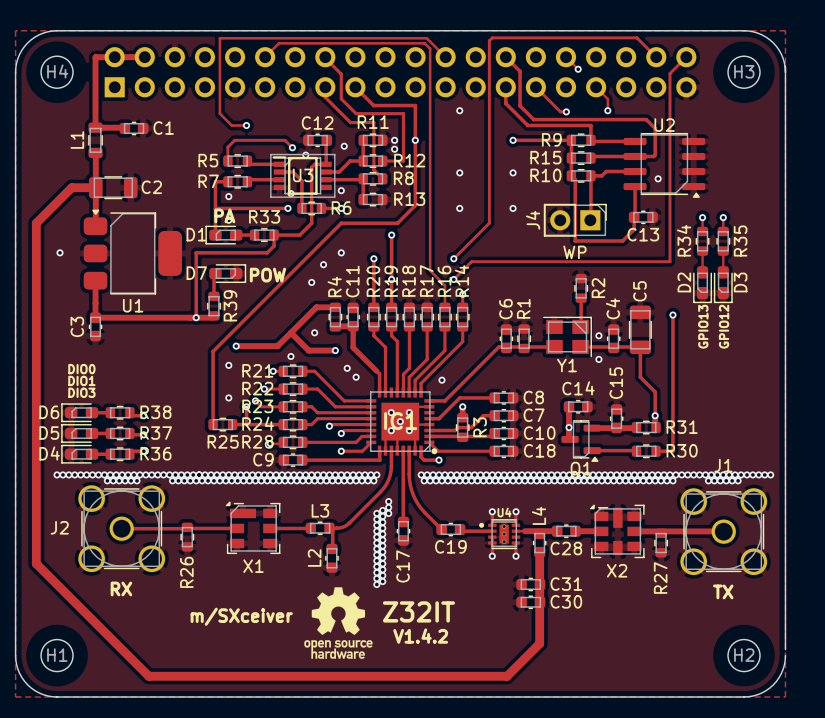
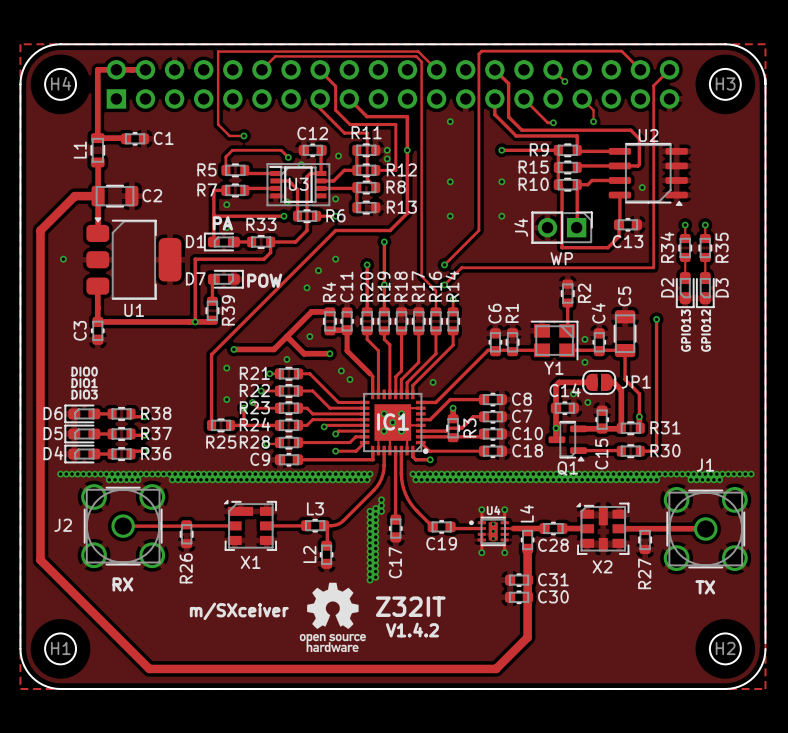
track: none -> (591, 382) (559, 382) (556, 385) (556, 408)
JP1: none -> (599, 382)
track: none -> (606, 382) (613, 382) (621, 390) (621, 428)
C15 name position: C15 (616, 383) -> C15 (601, 454)
via: none -> (573, 393)
via: none -> (587, 402)

